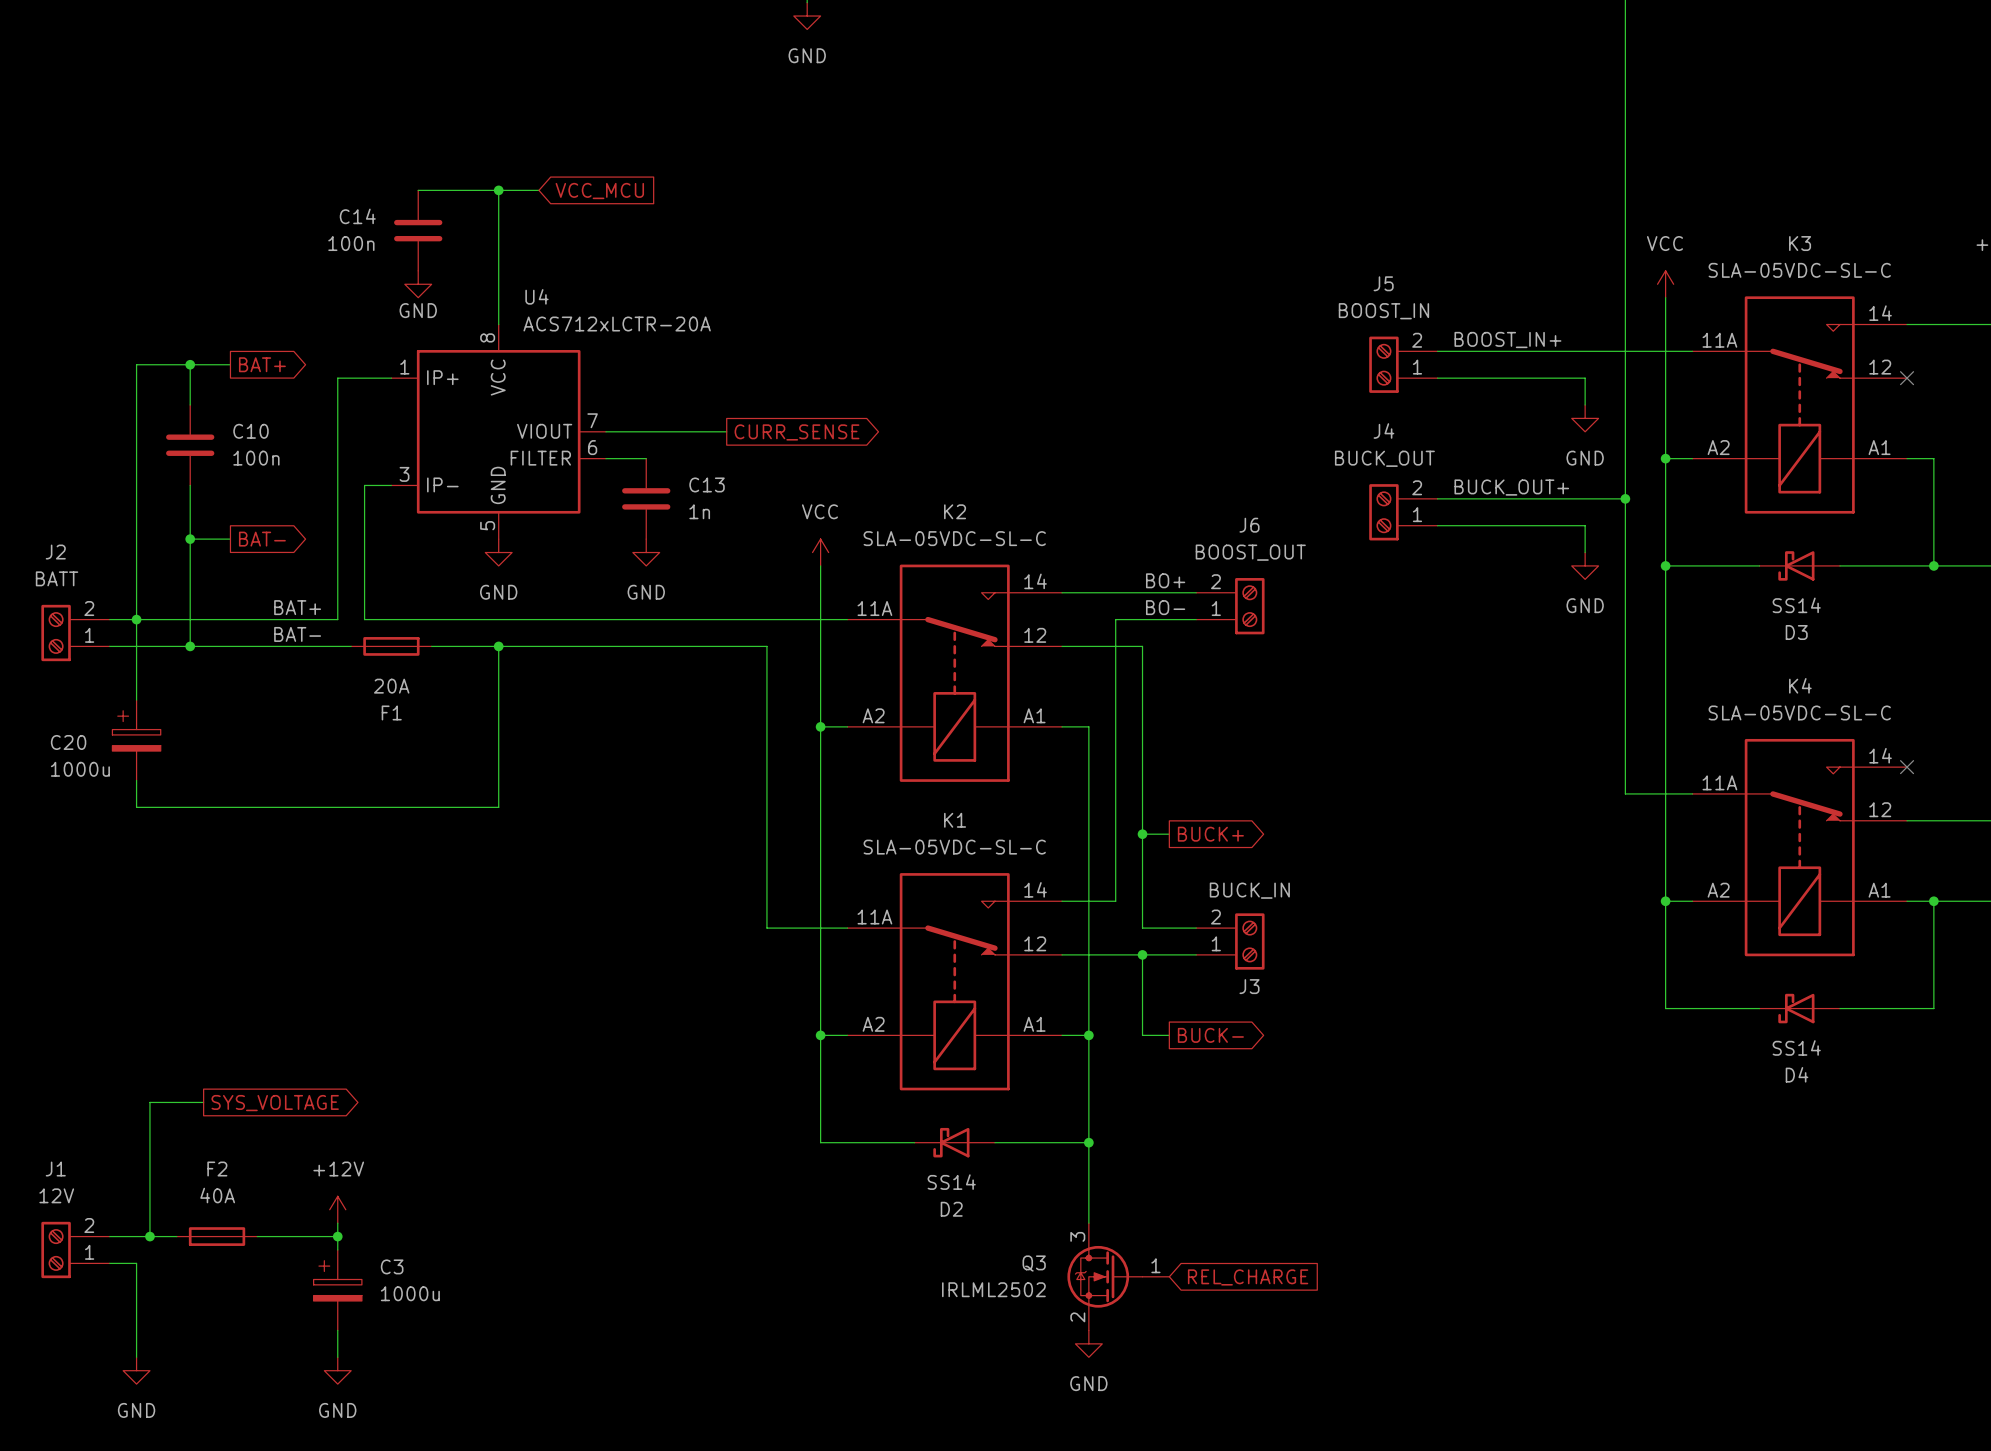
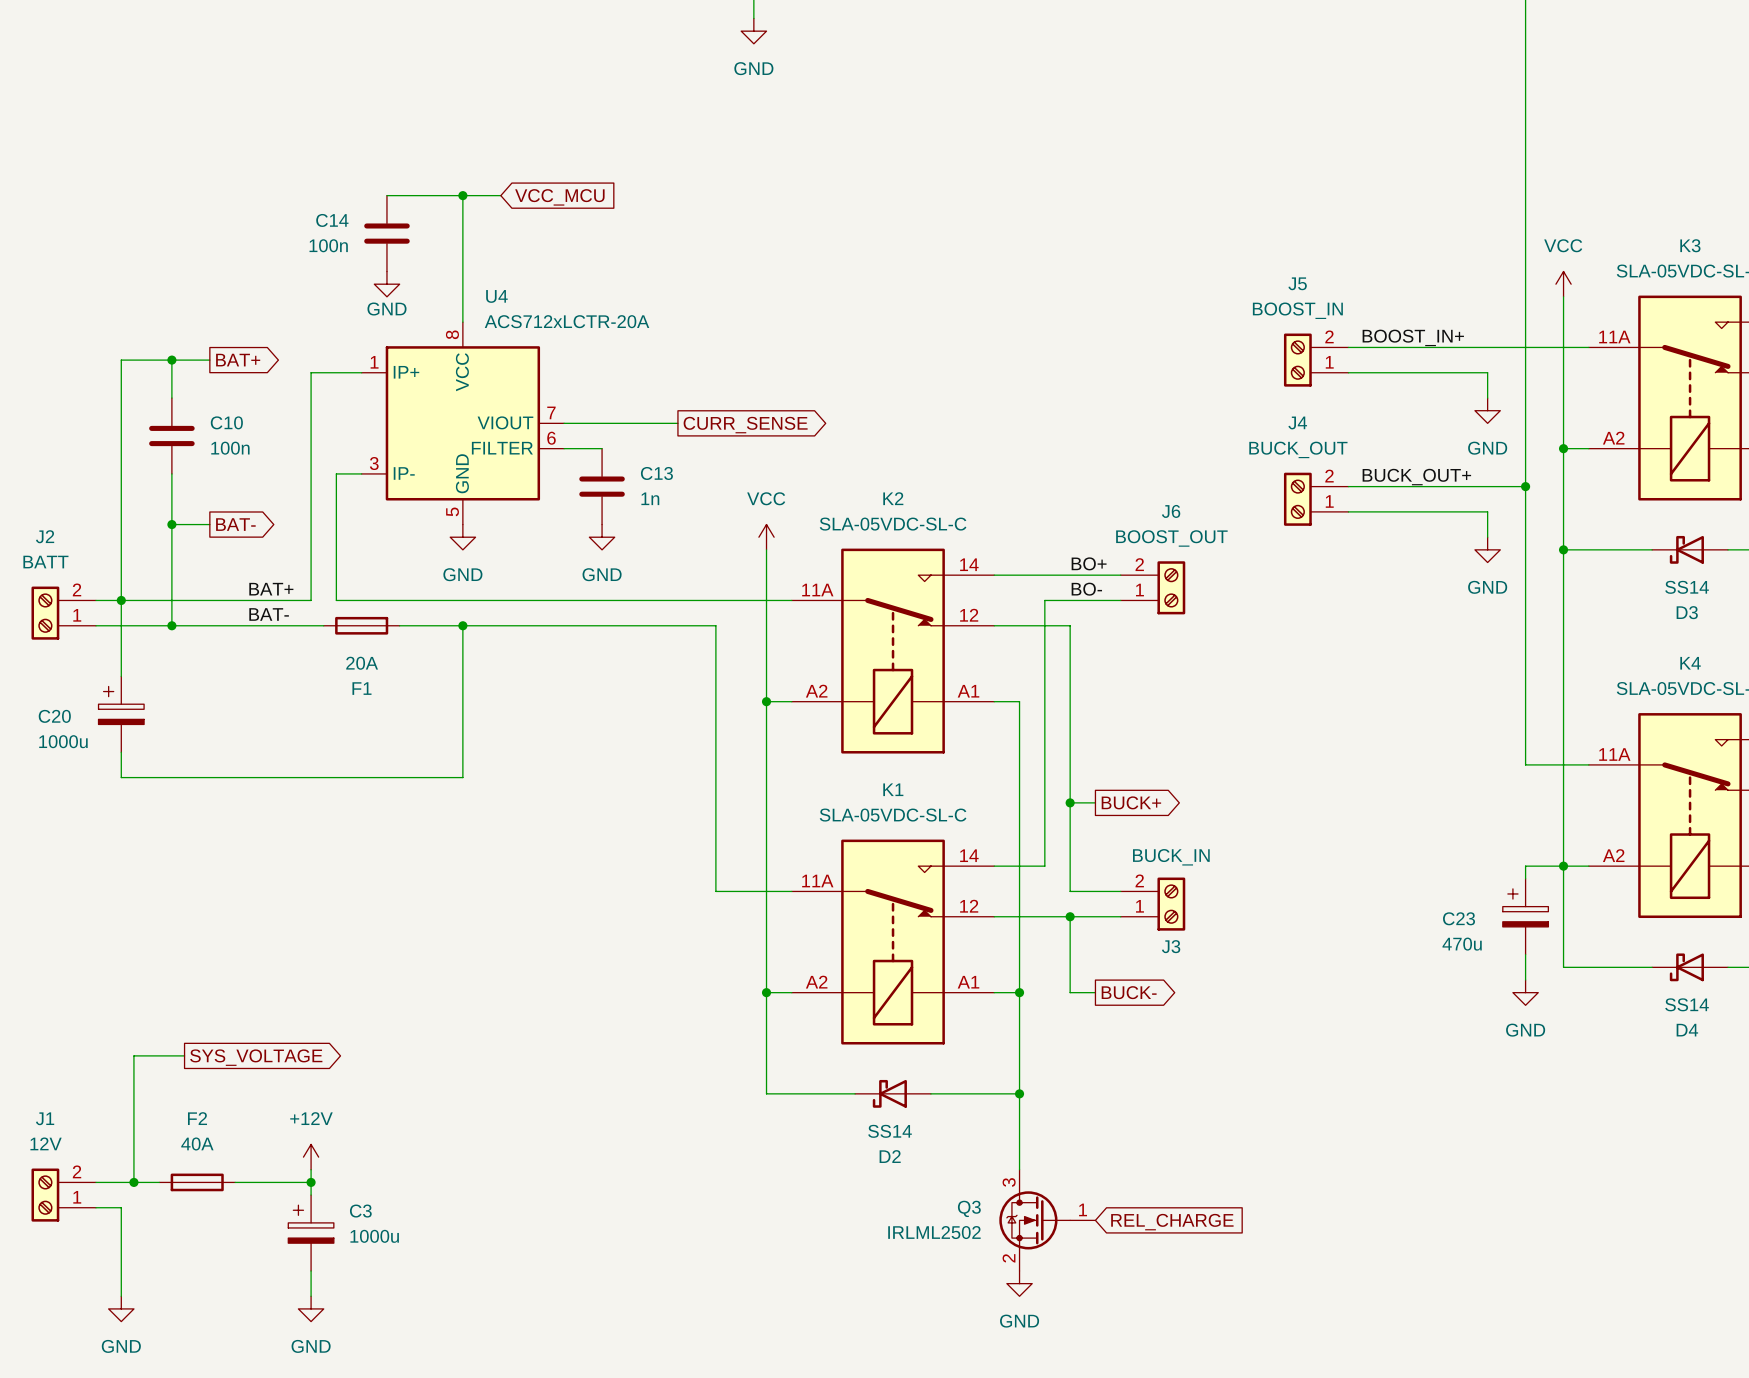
wire: none -> (1563, 866) (1525, 866) (1525, 878)
C23: none -> 470u (1525, 916)
wire: none -> (1525, 954) (1525, 980)
power symbol: none -> GND (1525, 992)

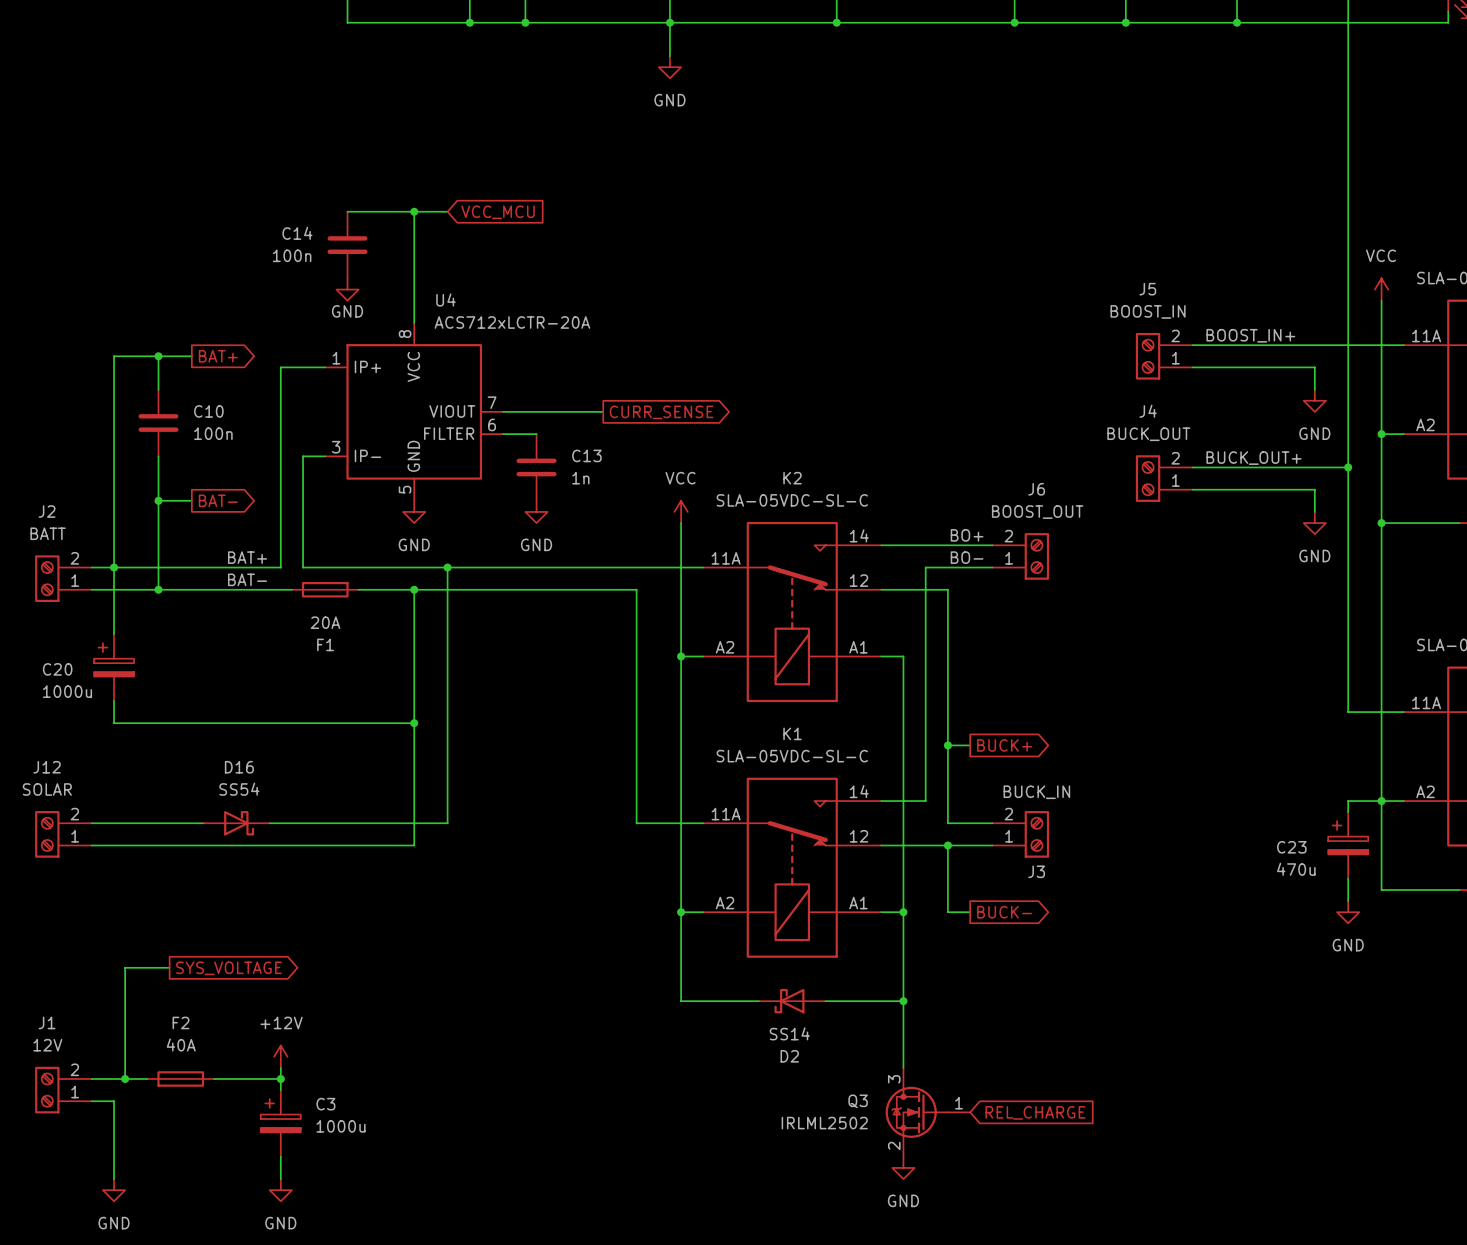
wire: none -> (447, 567) (447, 823) (269, 823)
junction: none -> (447, 567)
wire: none -> (414, 723) (414, 845) (91, 845)
junction: none -> (414, 723)
wire: none -> (91, 823) (202, 823)
D16: none -> SS54 (236, 823)
J12: none -> SOLAR (63, 834)

